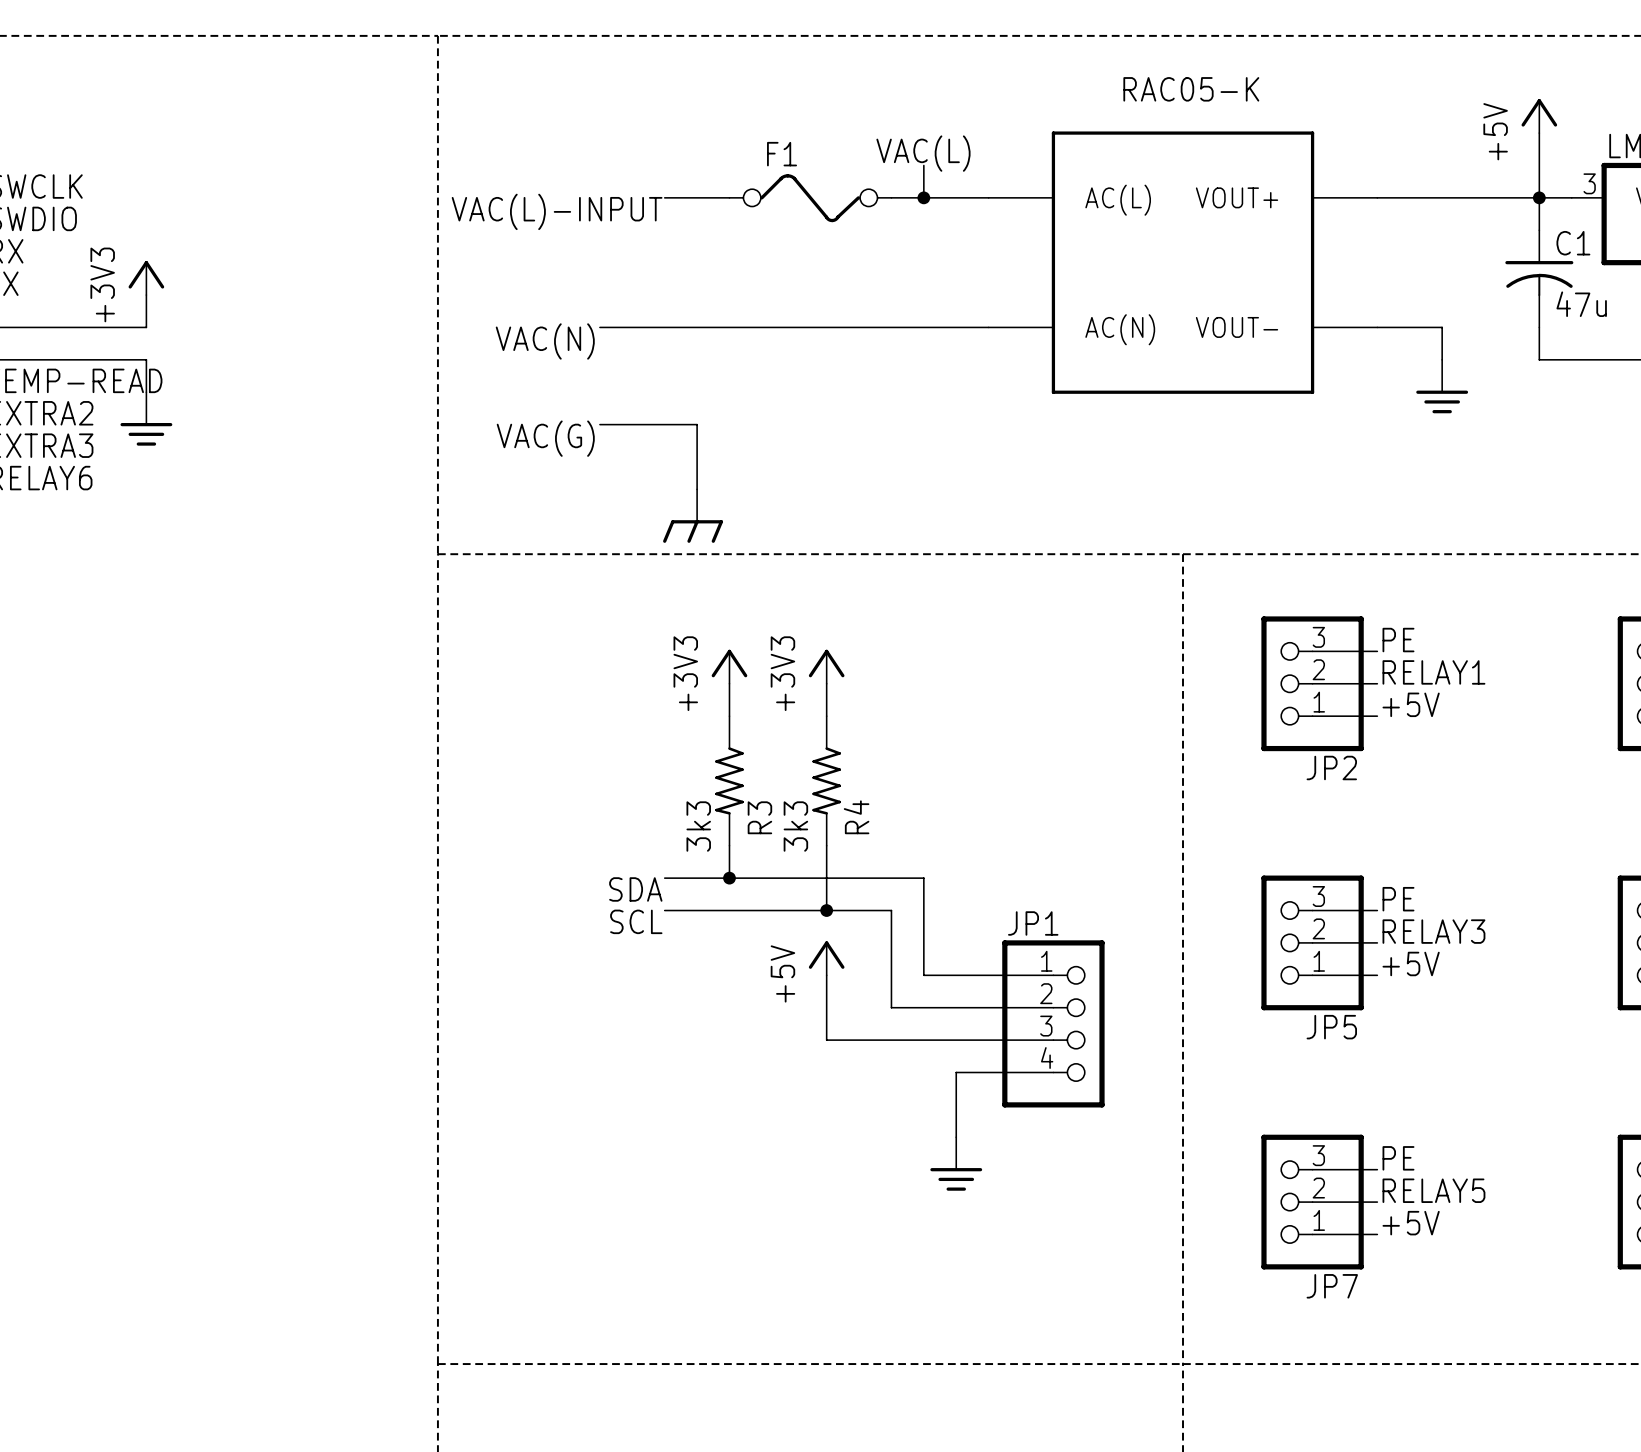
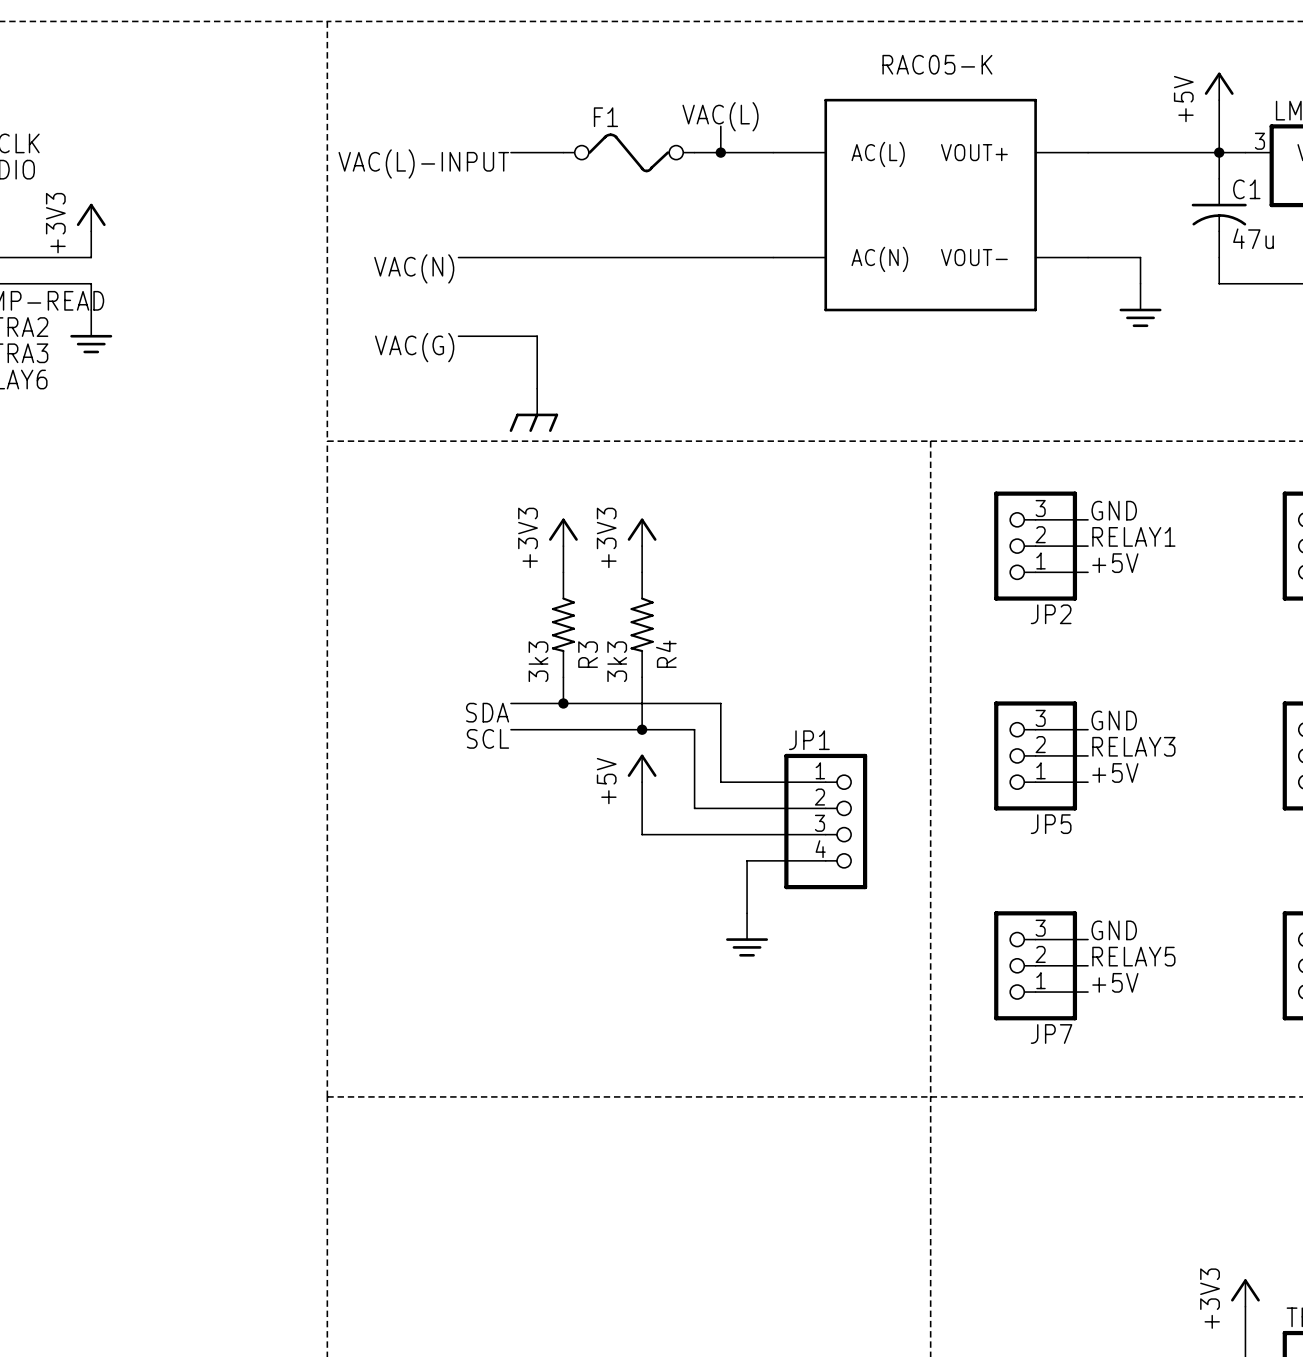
label: PE (1398, 640) -> GND (1114, 510)
label: PE (1398, 899) -> GND (1114, 720)
label: PE (1398, 1158) -> GND (1114, 930)

